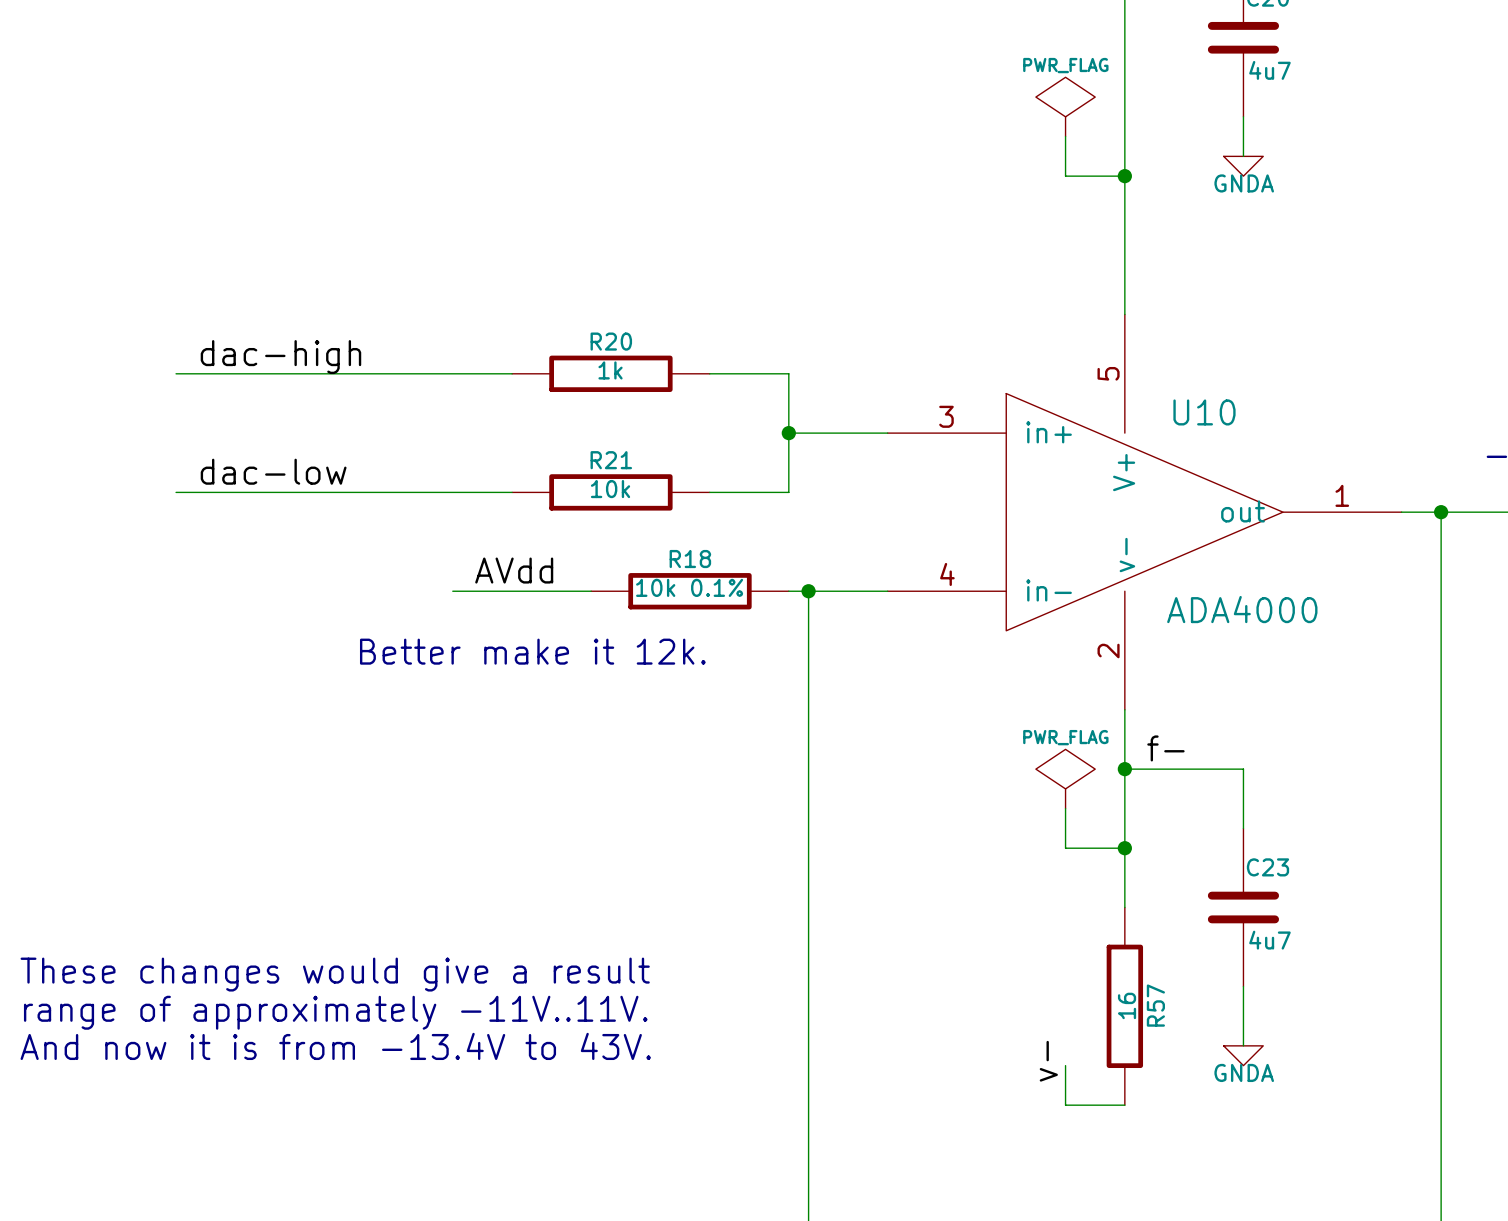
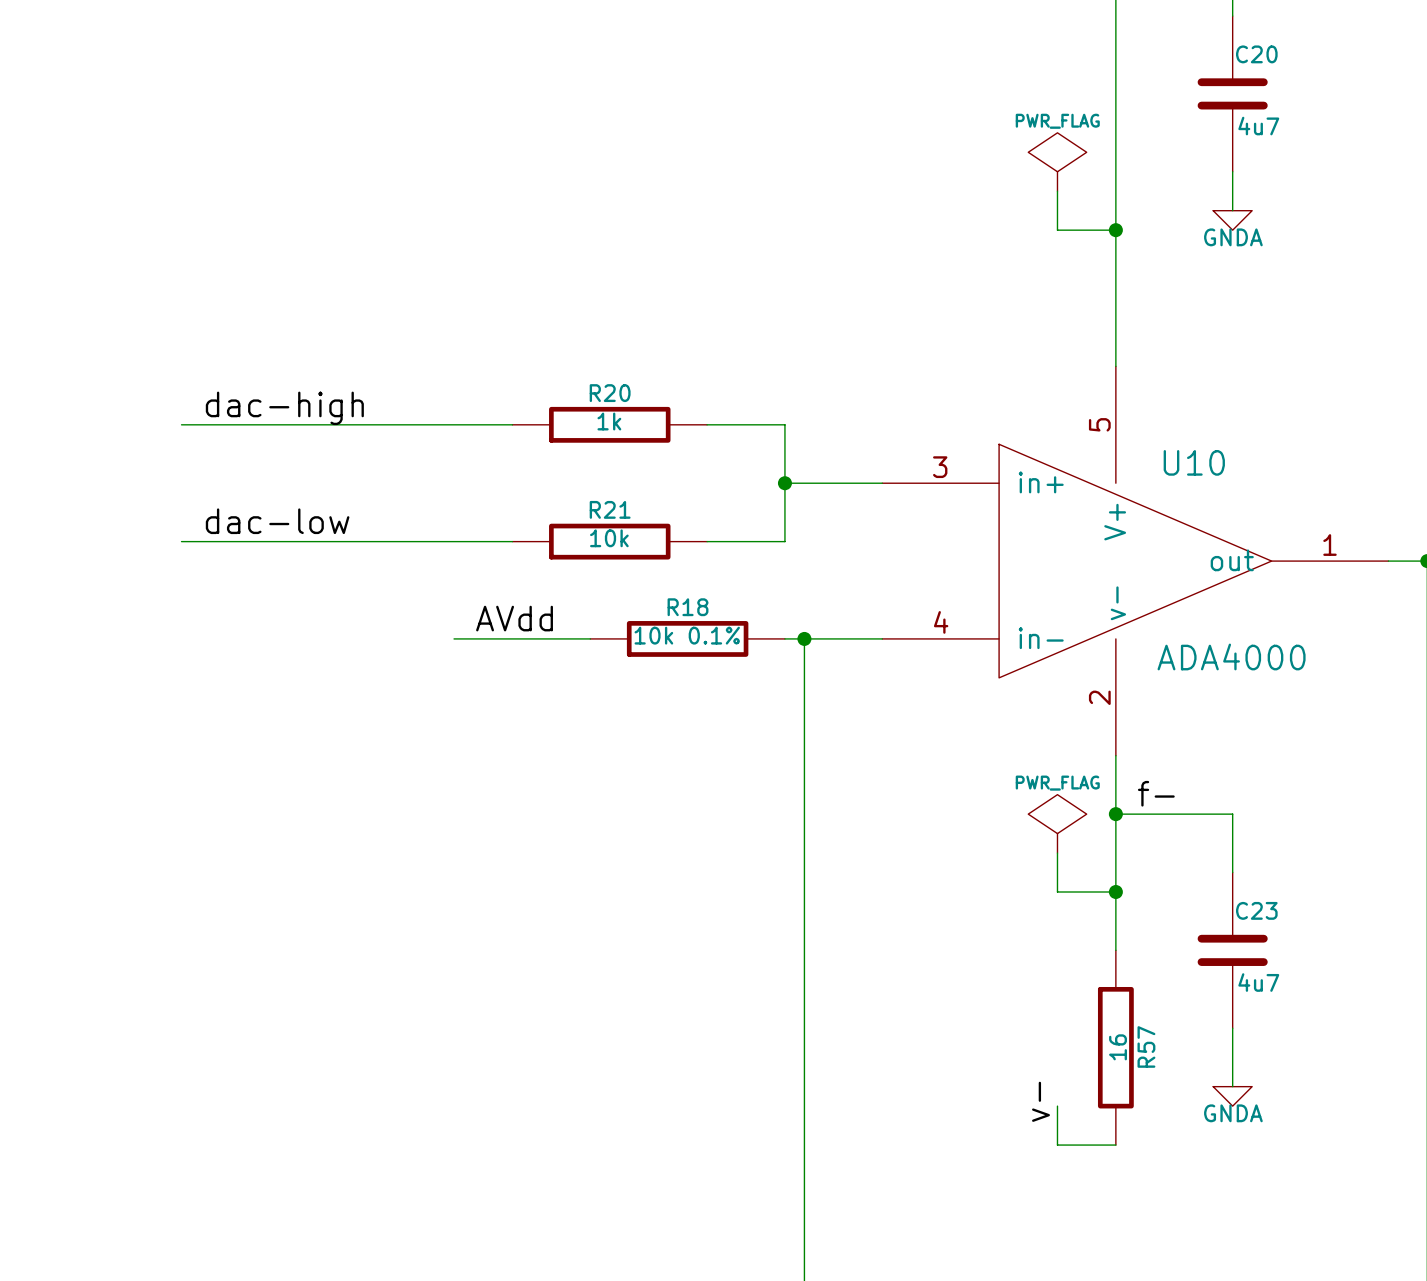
text: Better make it 12k. (532, 651) -> none
text: These changes would give a result (335, 974) -> none
text: range of approximately -11V..11V. (335, 1012) -> none
text: And now it is from -13.4V to 43V. (335, 1046) -> none

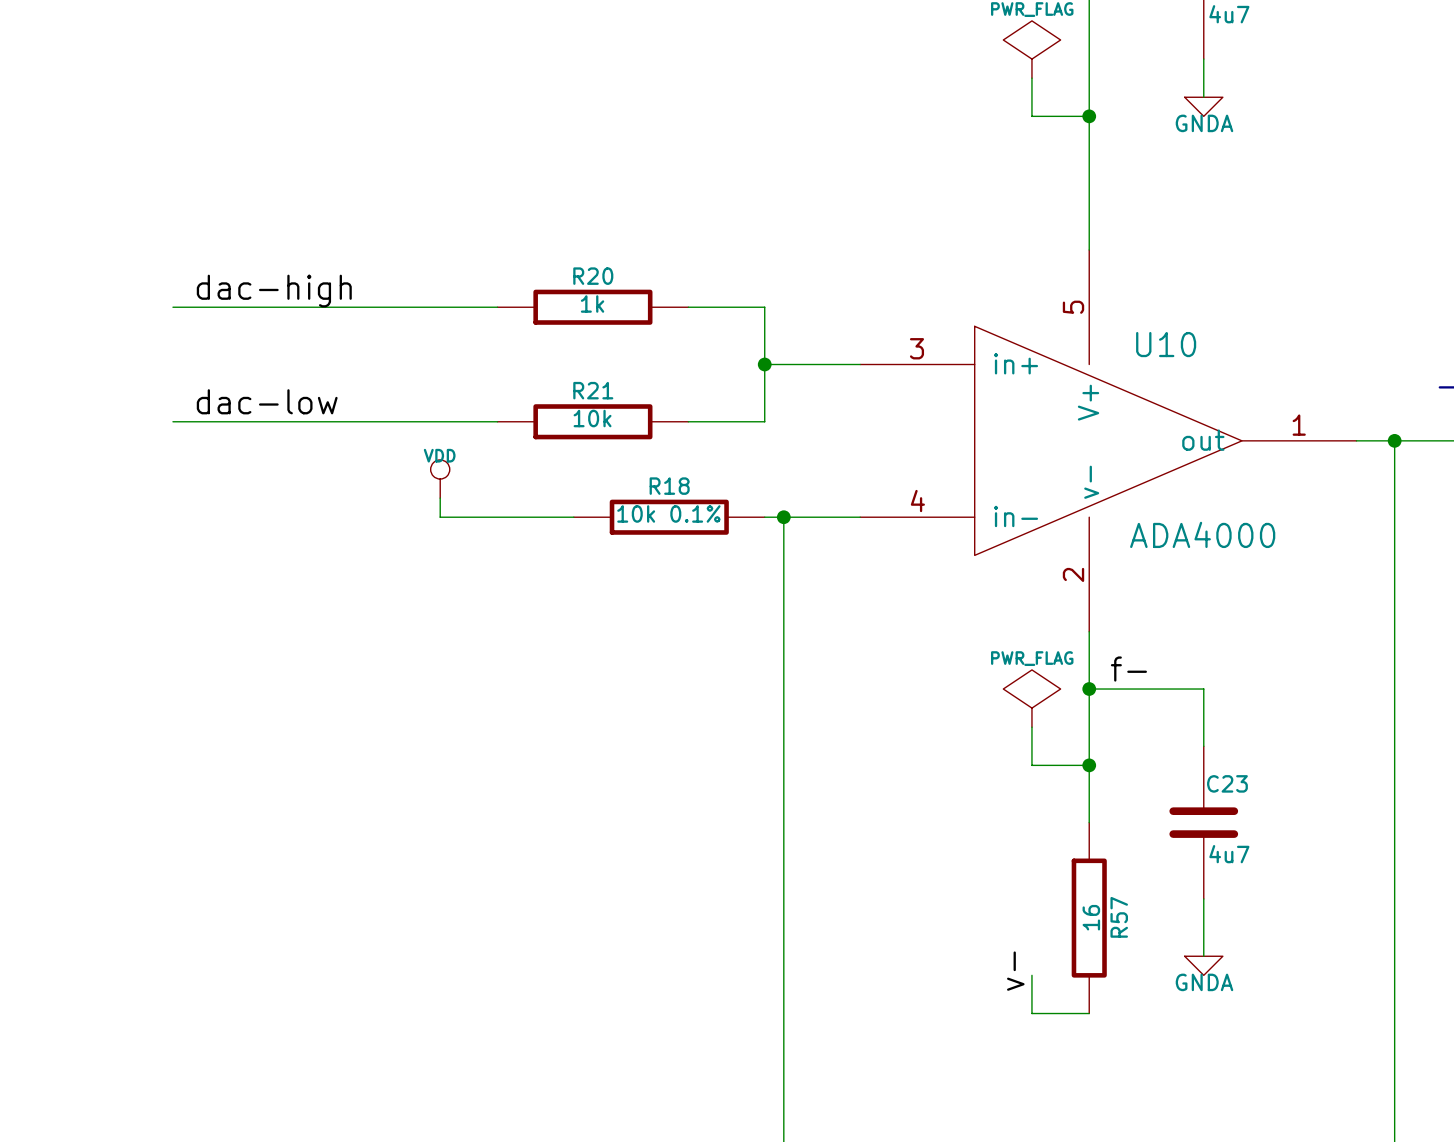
power symbol: none -> VDD (440, 479)
label: AVdd (514, 618) -> none
wire: none -> (440, 498) (440, 517)

